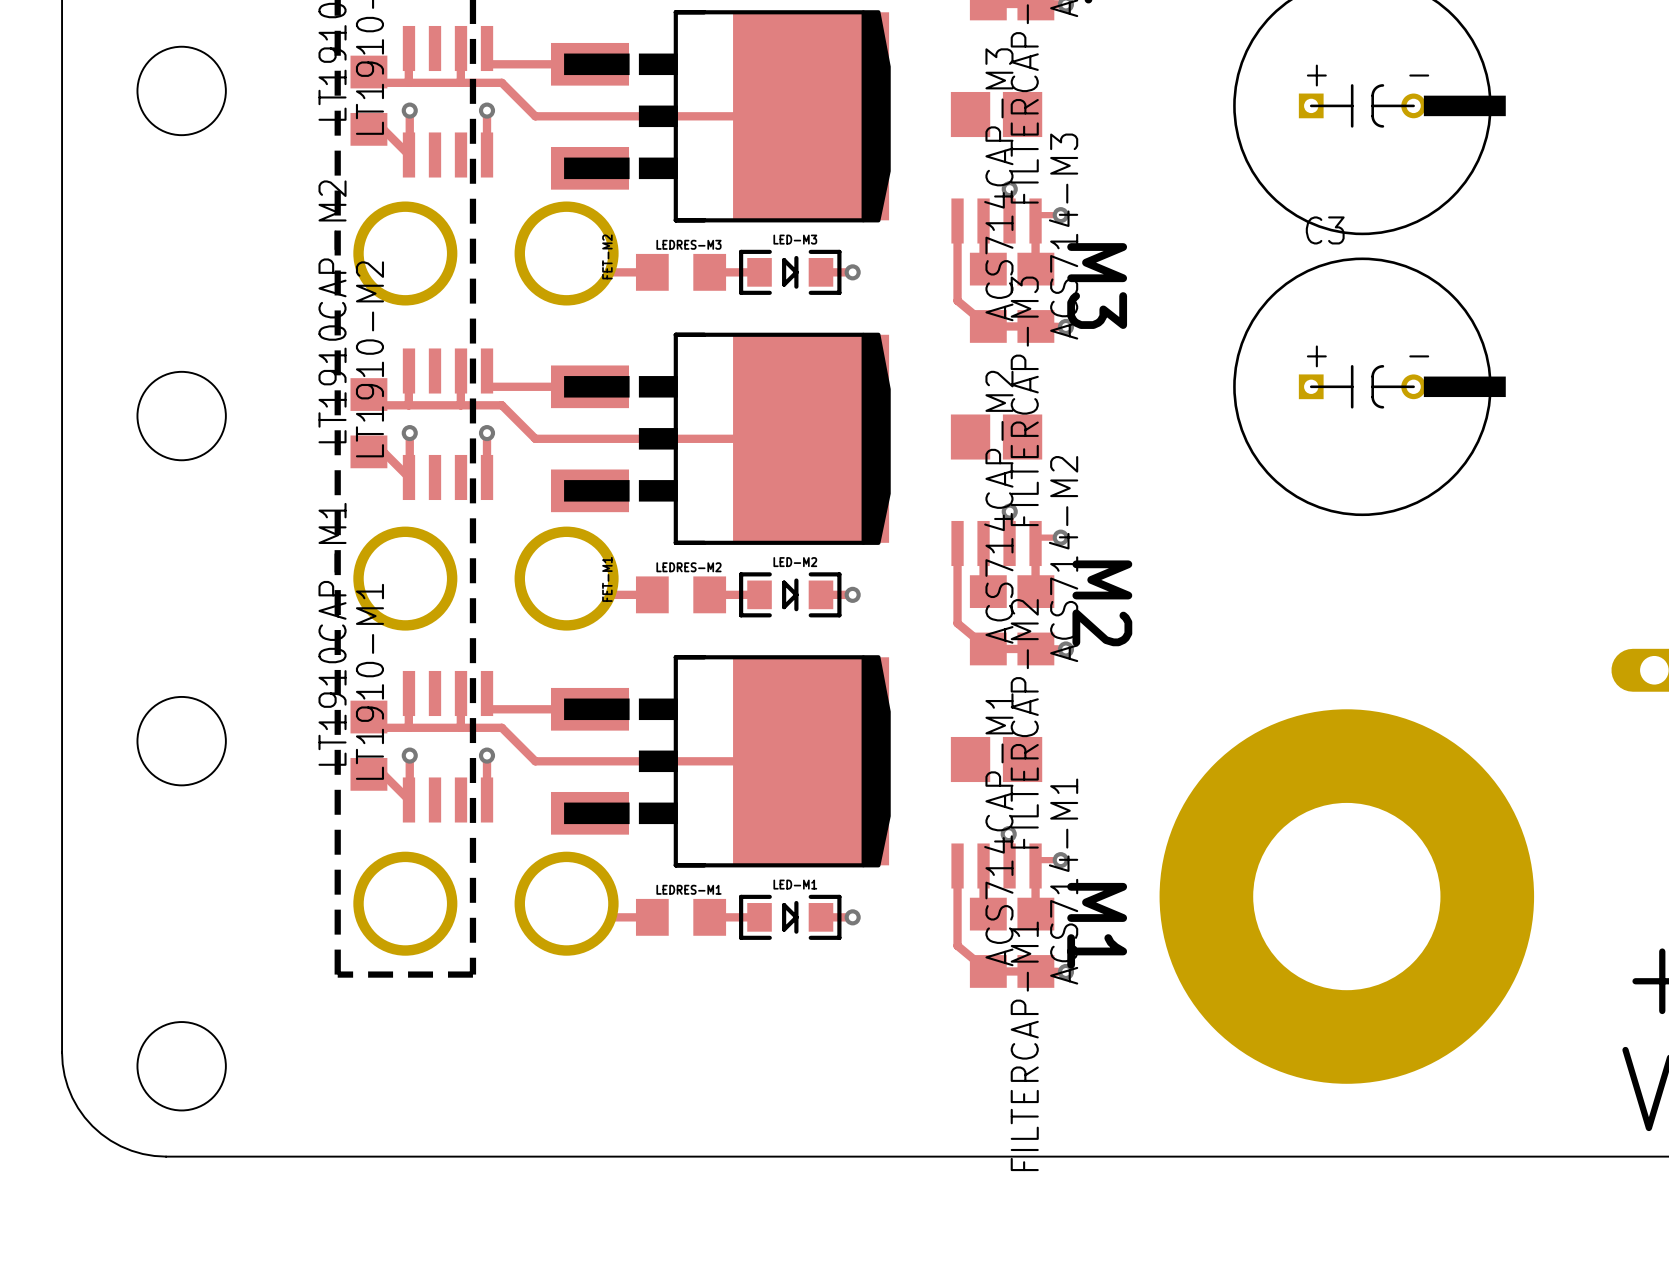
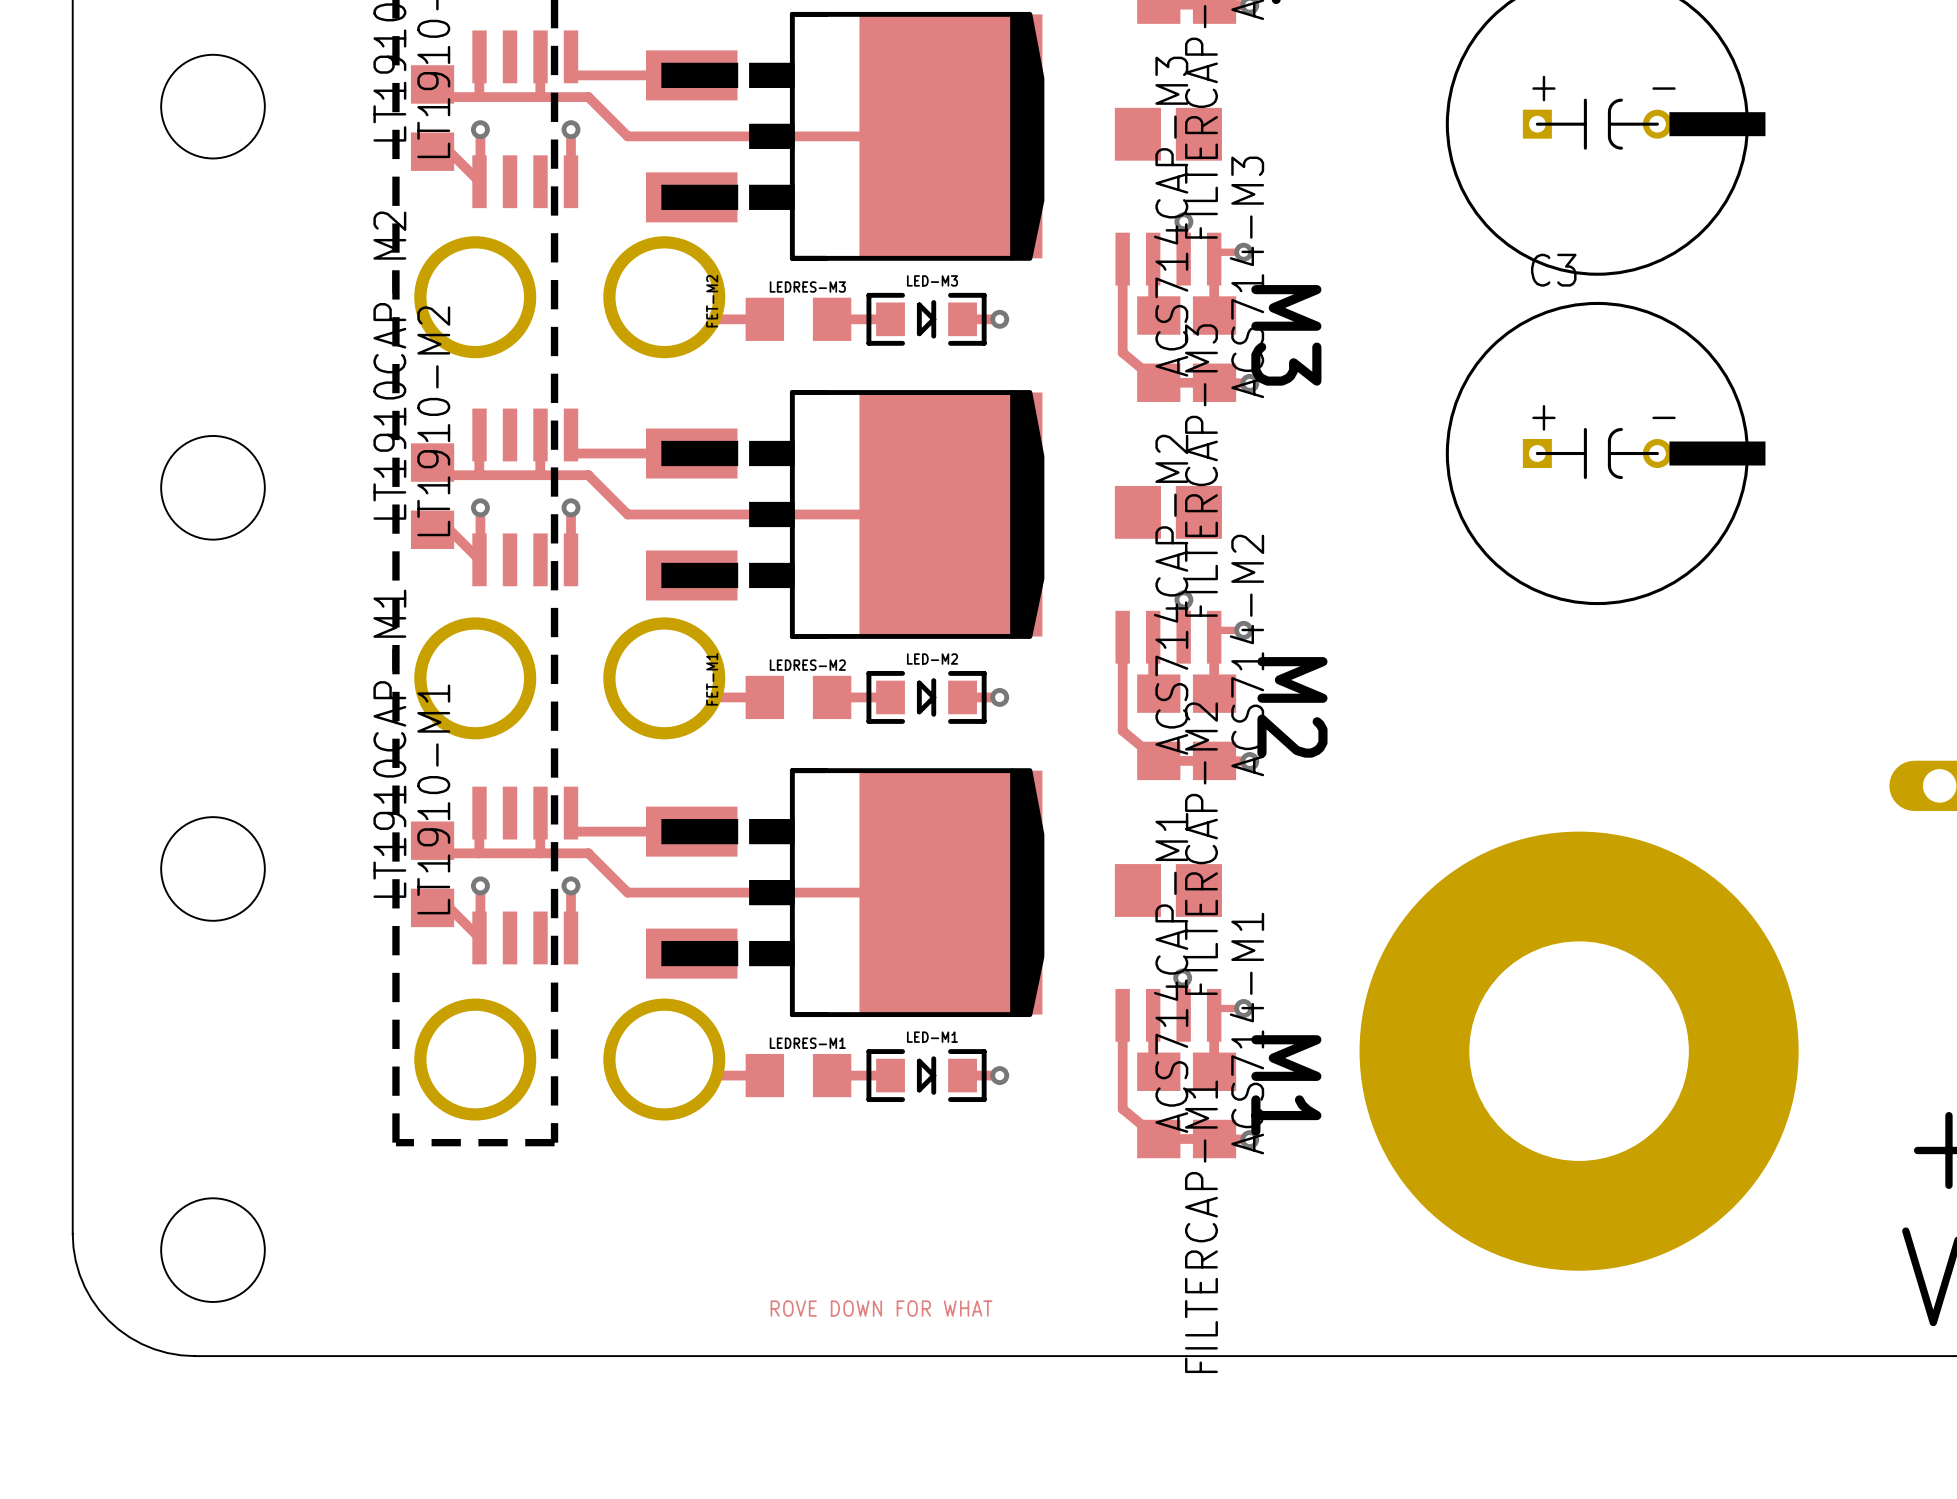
text: none -> ROVE DOWN FOR WHAT (881, 1308)

